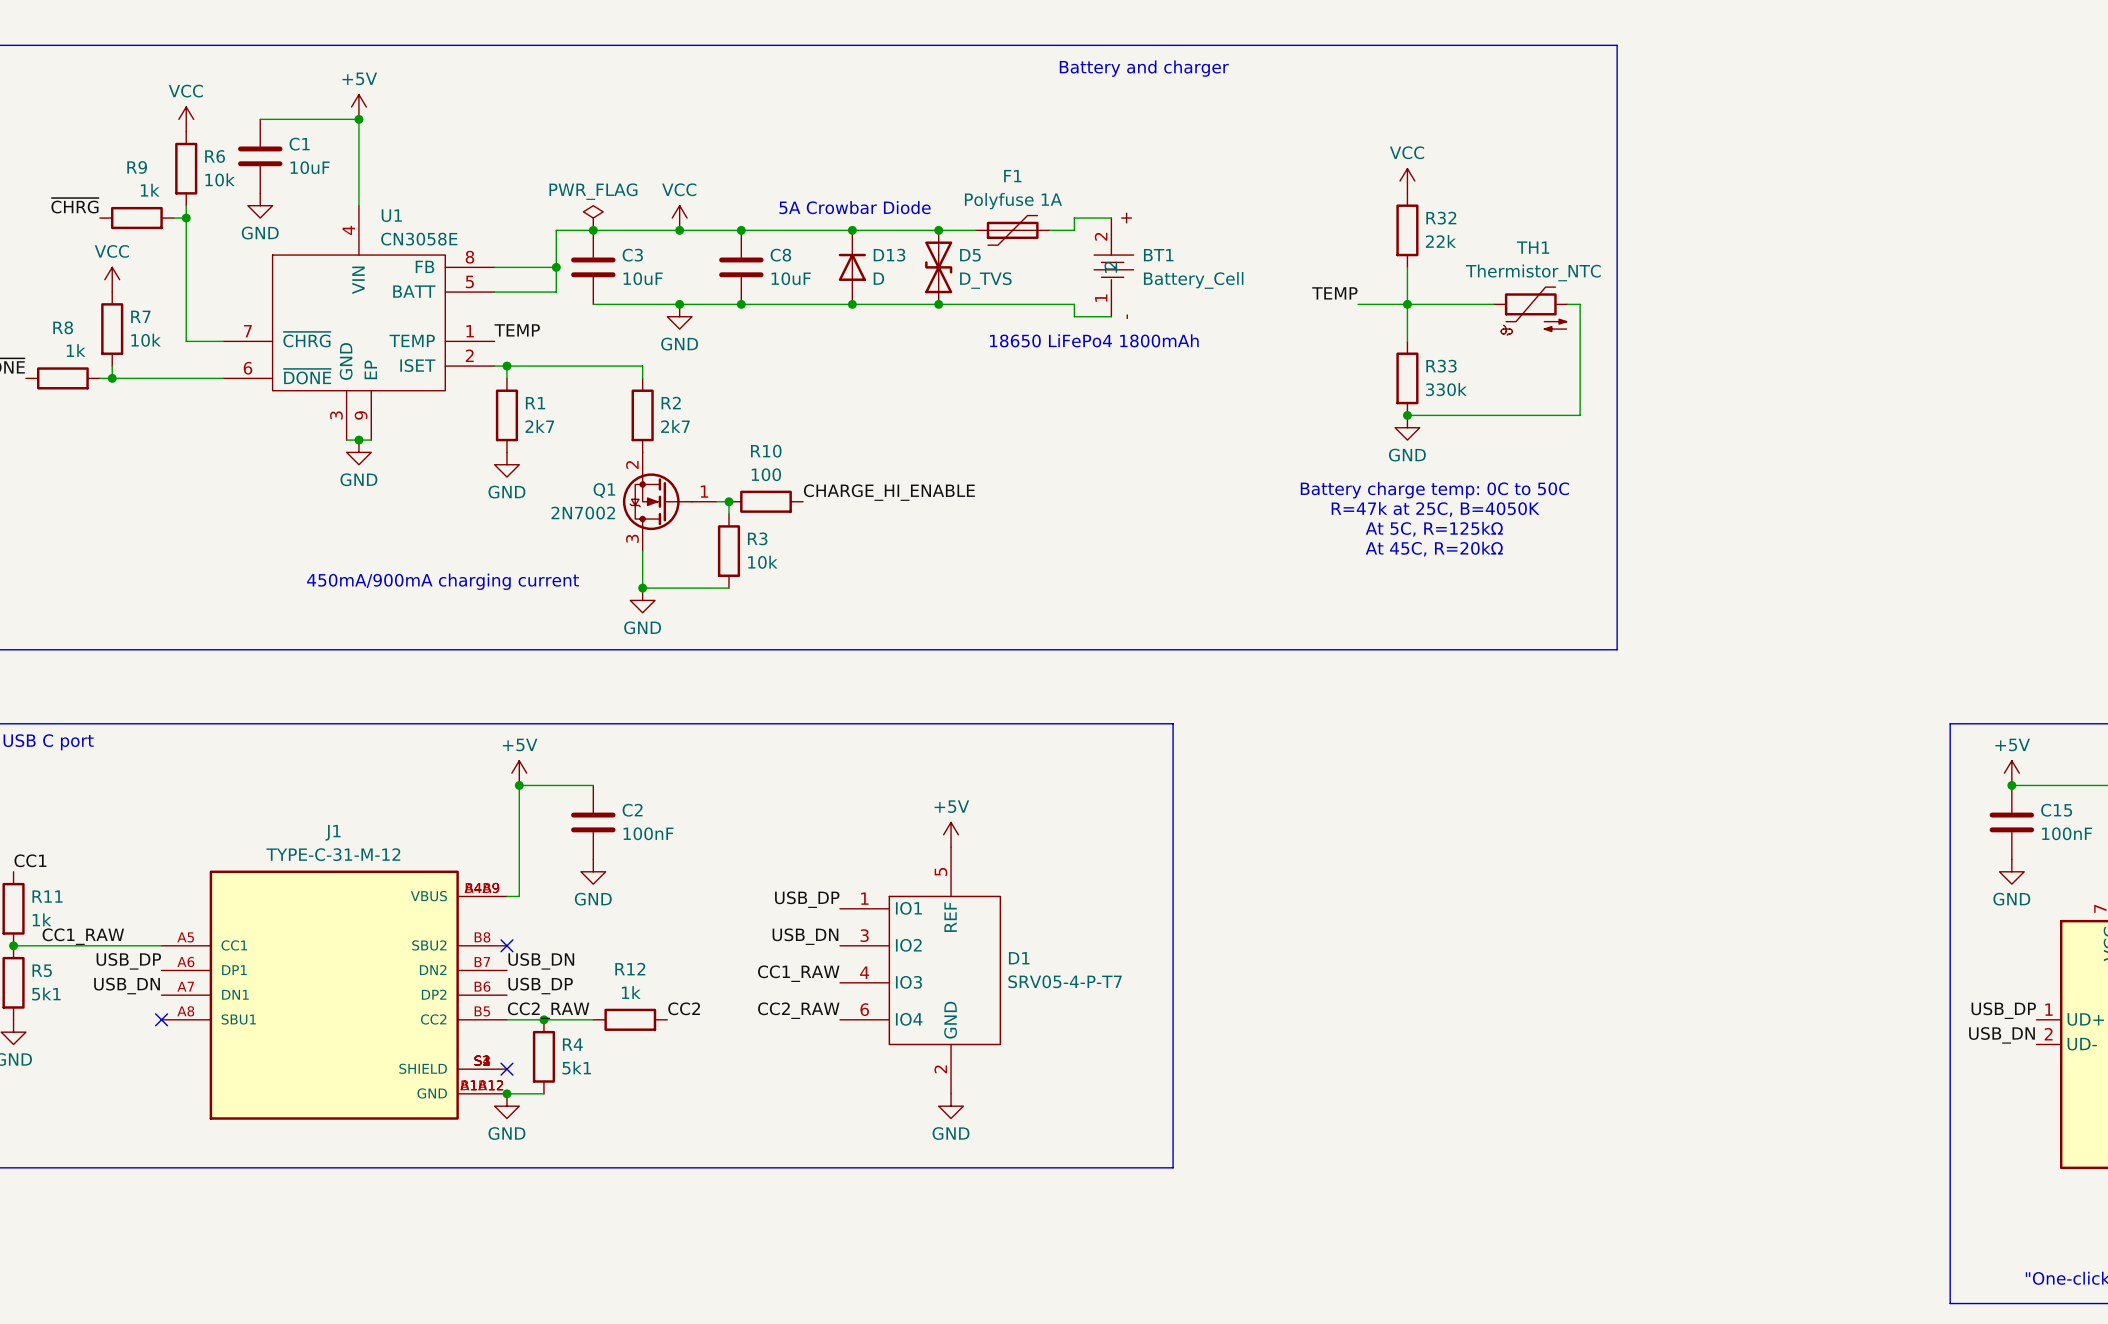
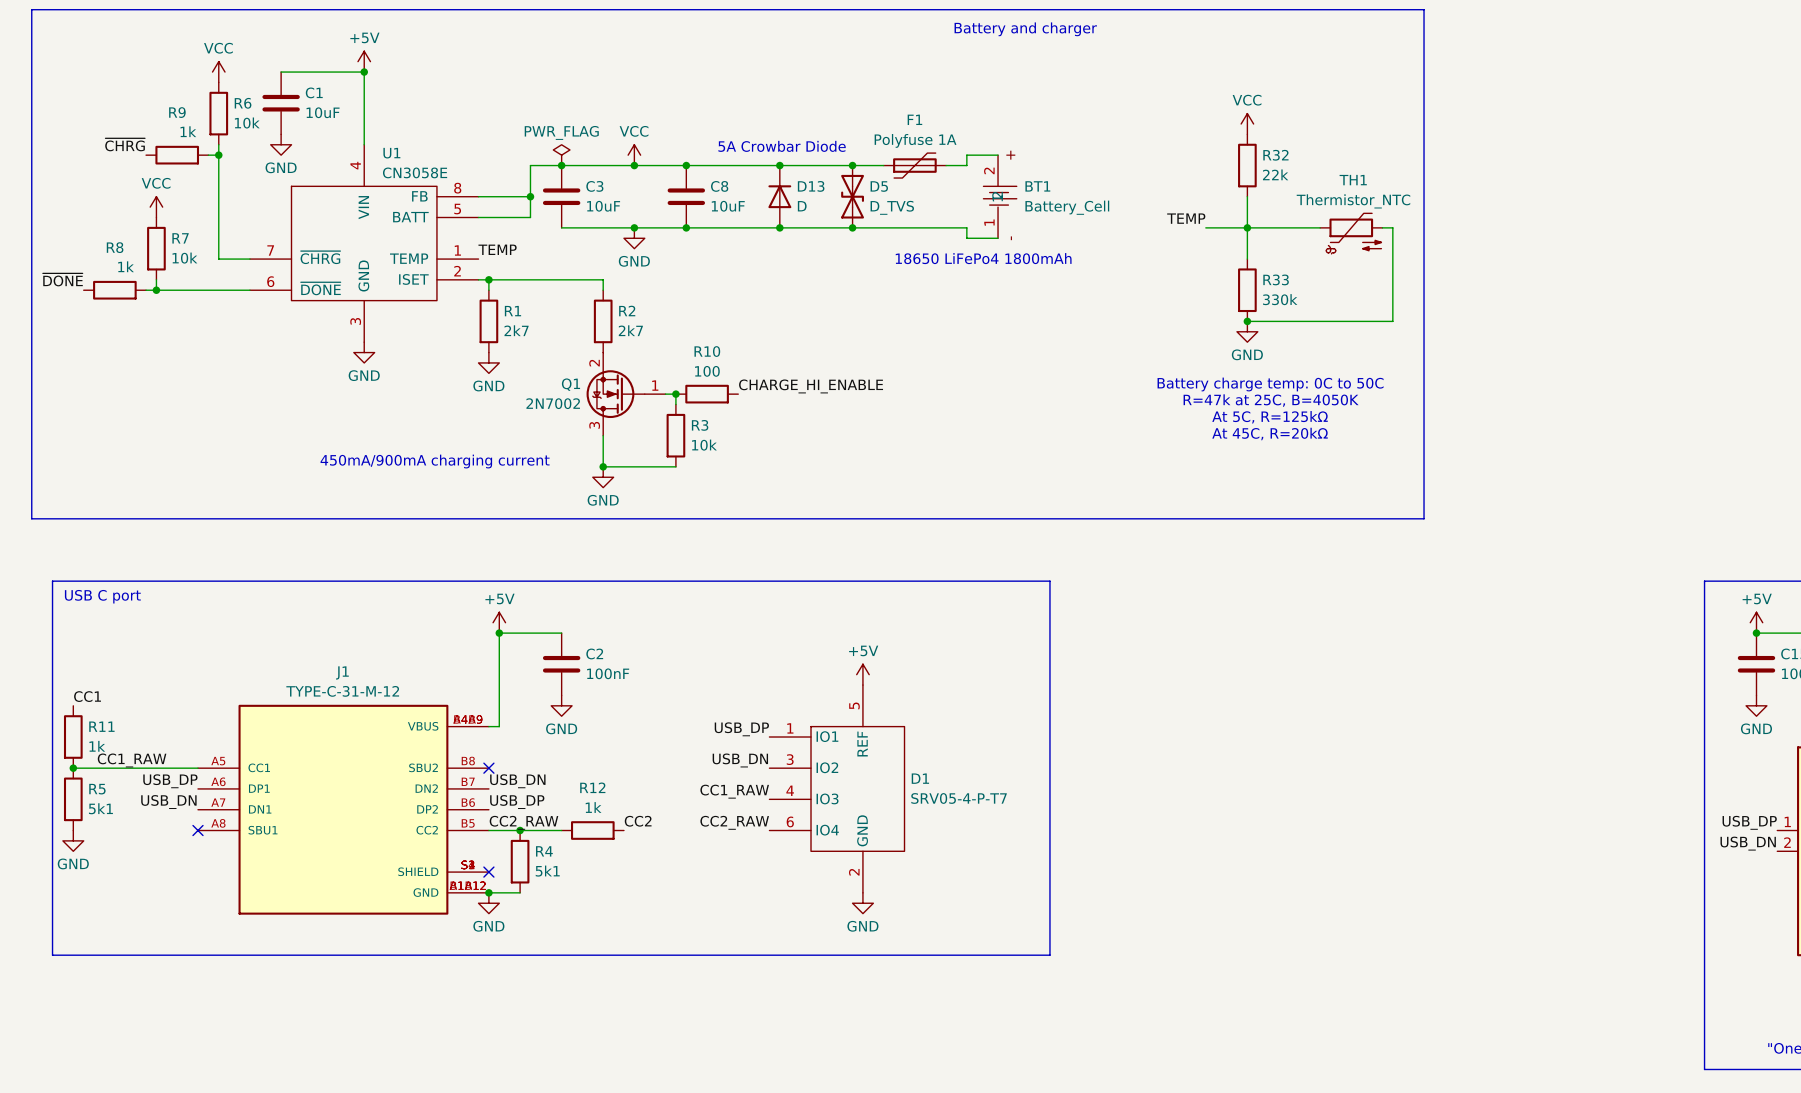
U1 symbol: [223, 205, 495, 441] -> [249, 144, 479, 343]
wire: (346, 440) (371, 440) -> none
junction: (358, 440) -> none

